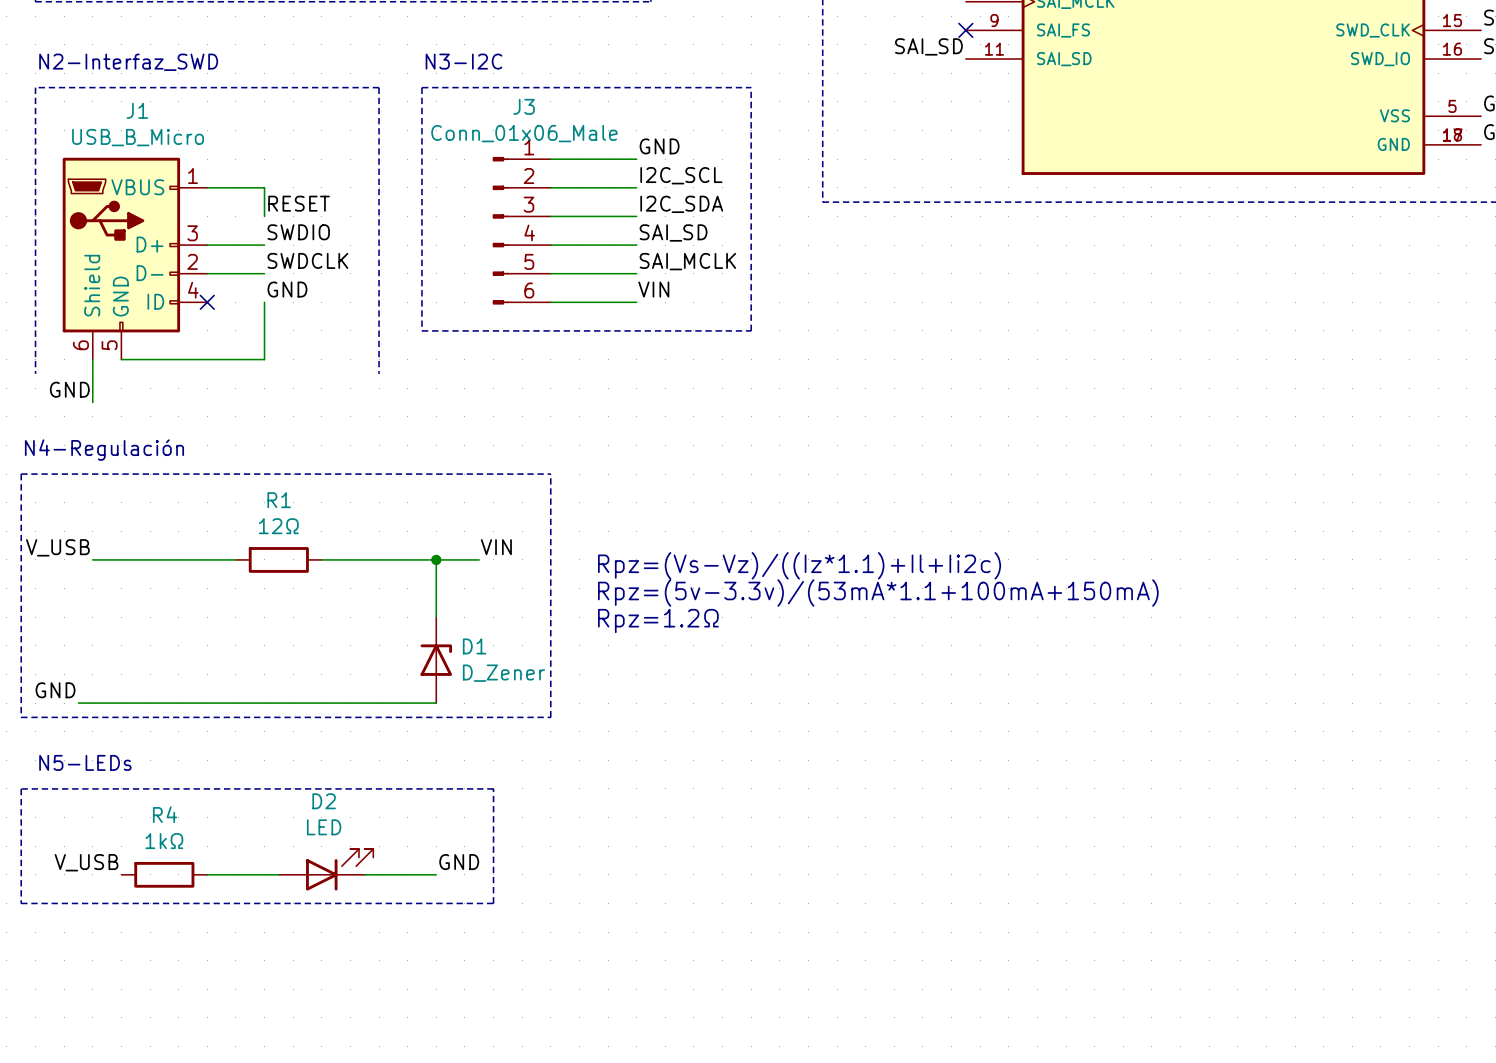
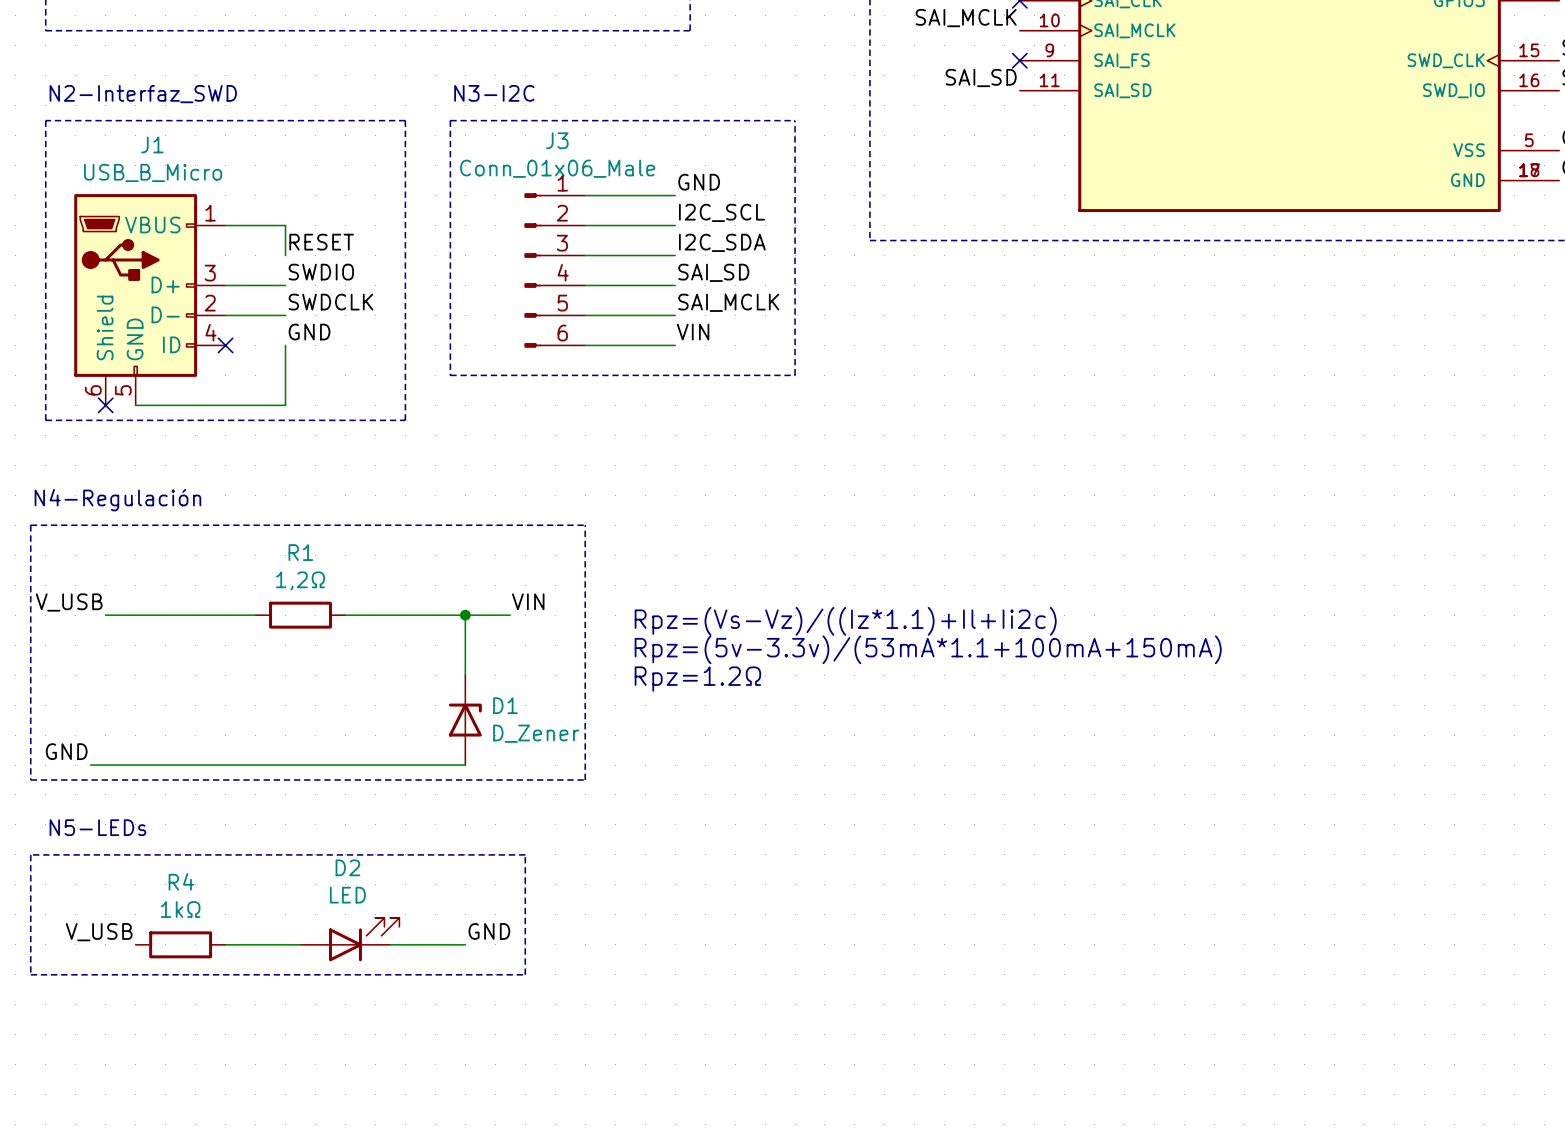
wire: (92, 359) (92, 402) -> none
no-connect mark: none -> (105, 405)
line: none -> (45, 420) (405, 420)
label: GND (69, 389) -> none
R1 value: 12Ω (278, 526) -> 1,2Ω (300, 580)

